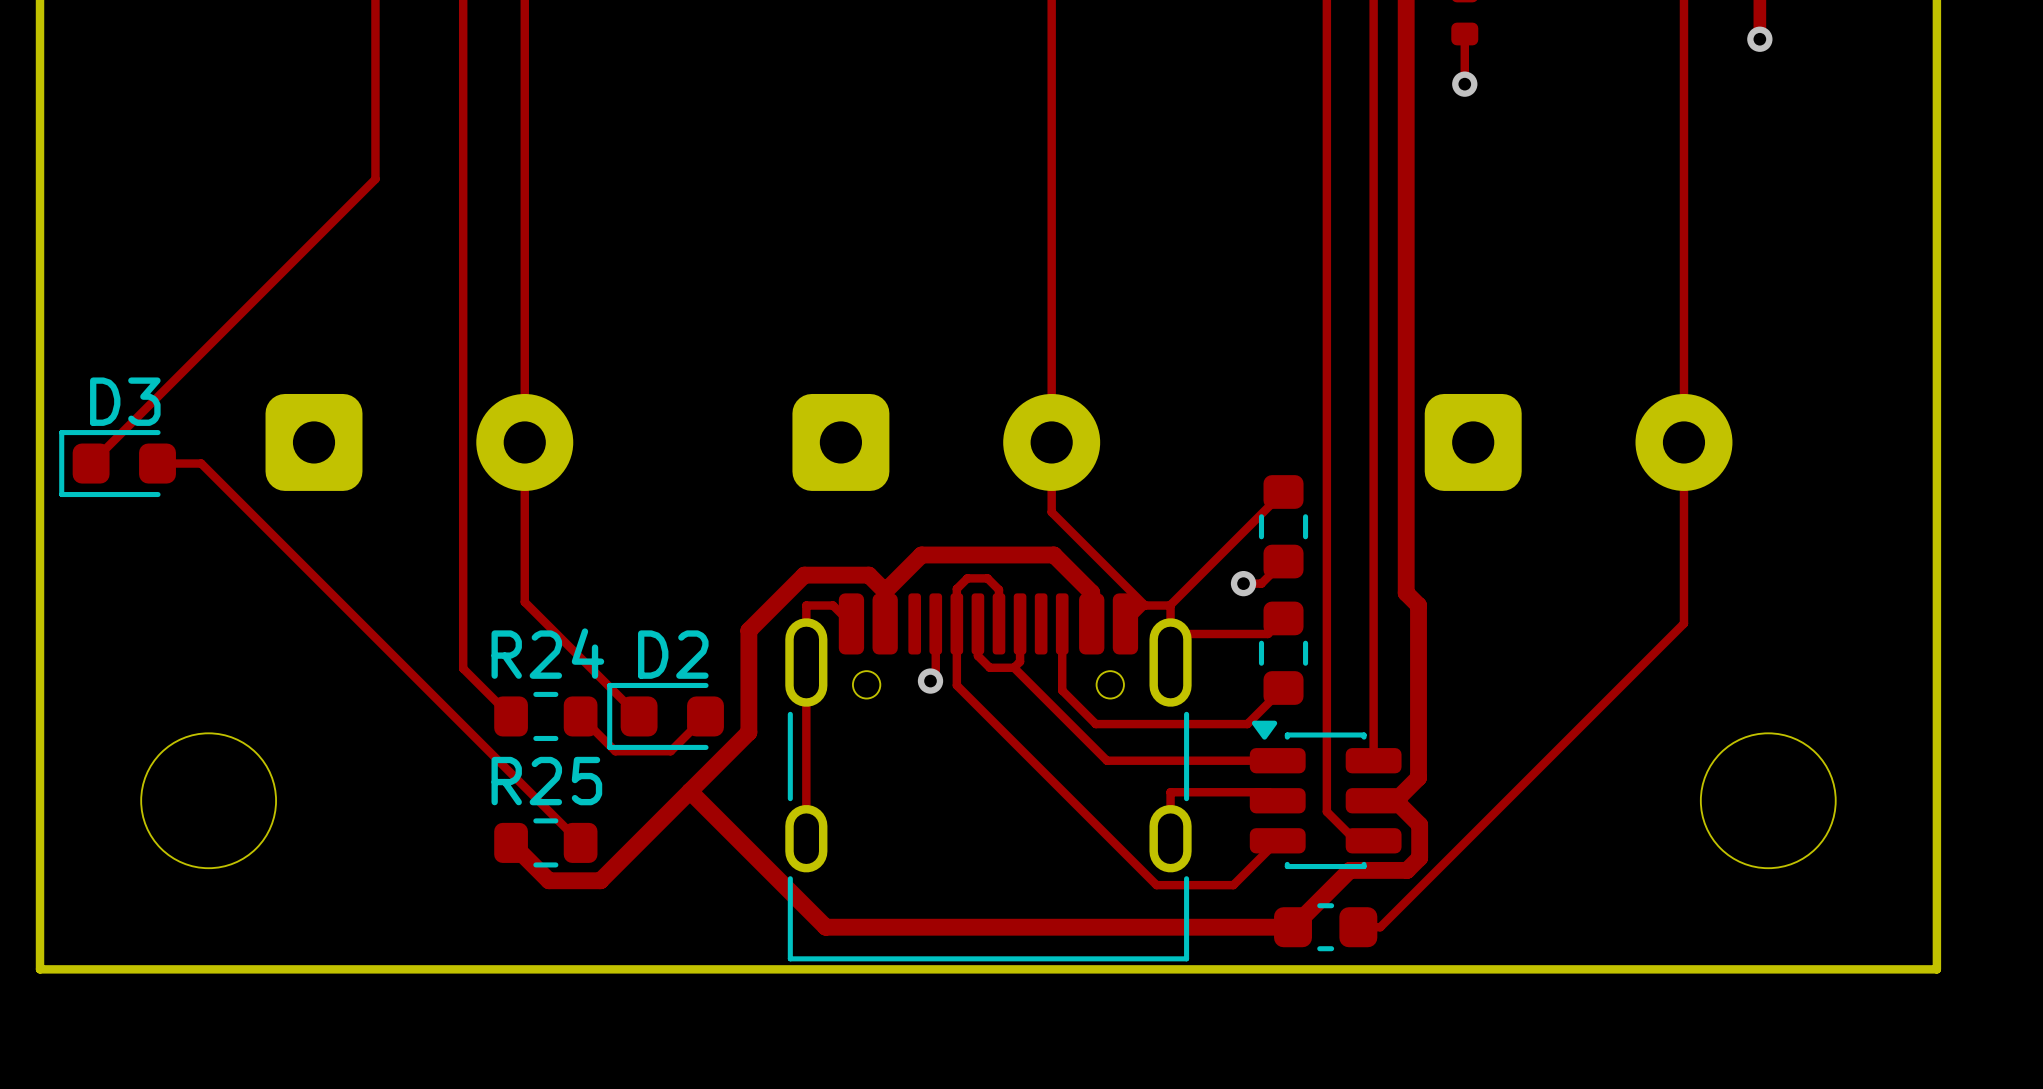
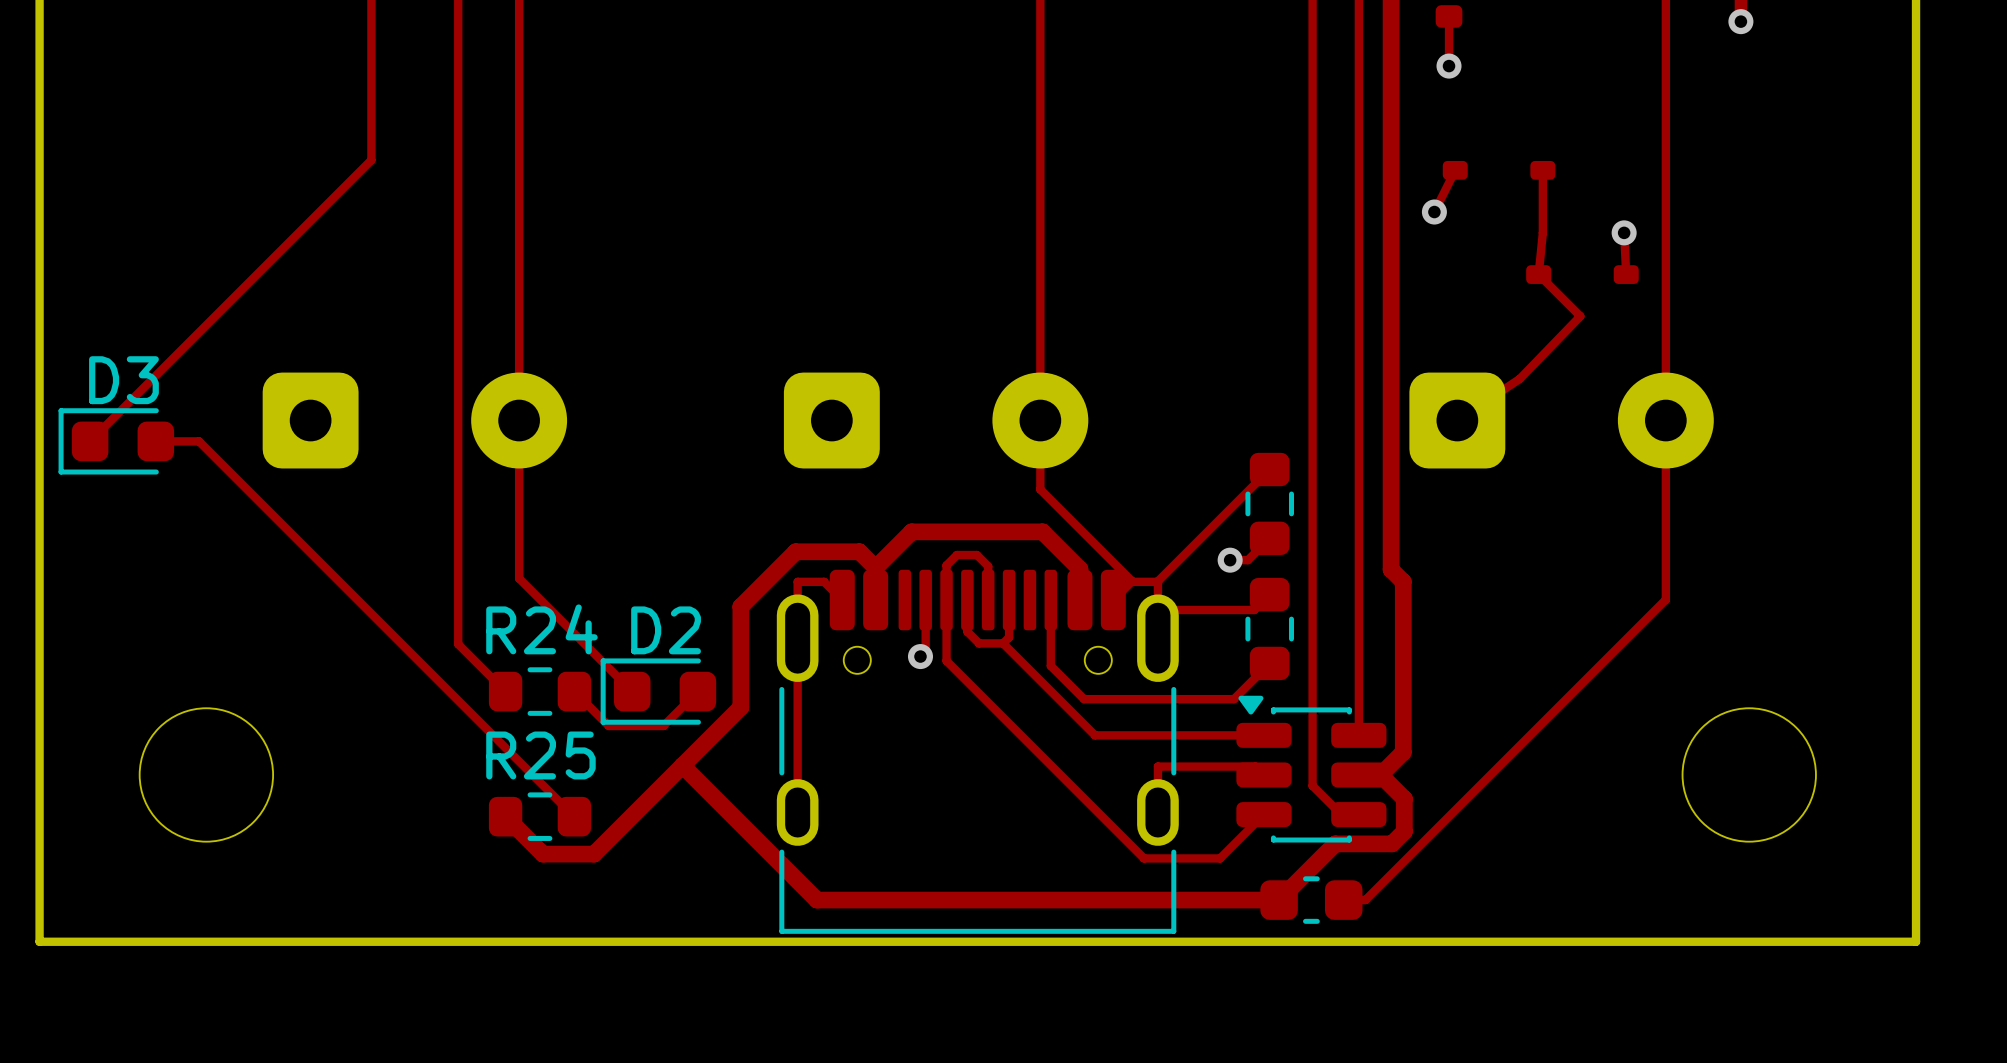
track: none -> (1455, 170) (1434, 212)
part: none -> (1499, 170)
track: none -> (1542, 170) (1542, 232) (1538, 274) (1580, 316) (1519, 378) (1457, 420)
via: none -> (1434, 212)
track: none -> (1624, 232) (1626, 274)
via: none -> (1624, 232)
part: none -> (1582, 274)

